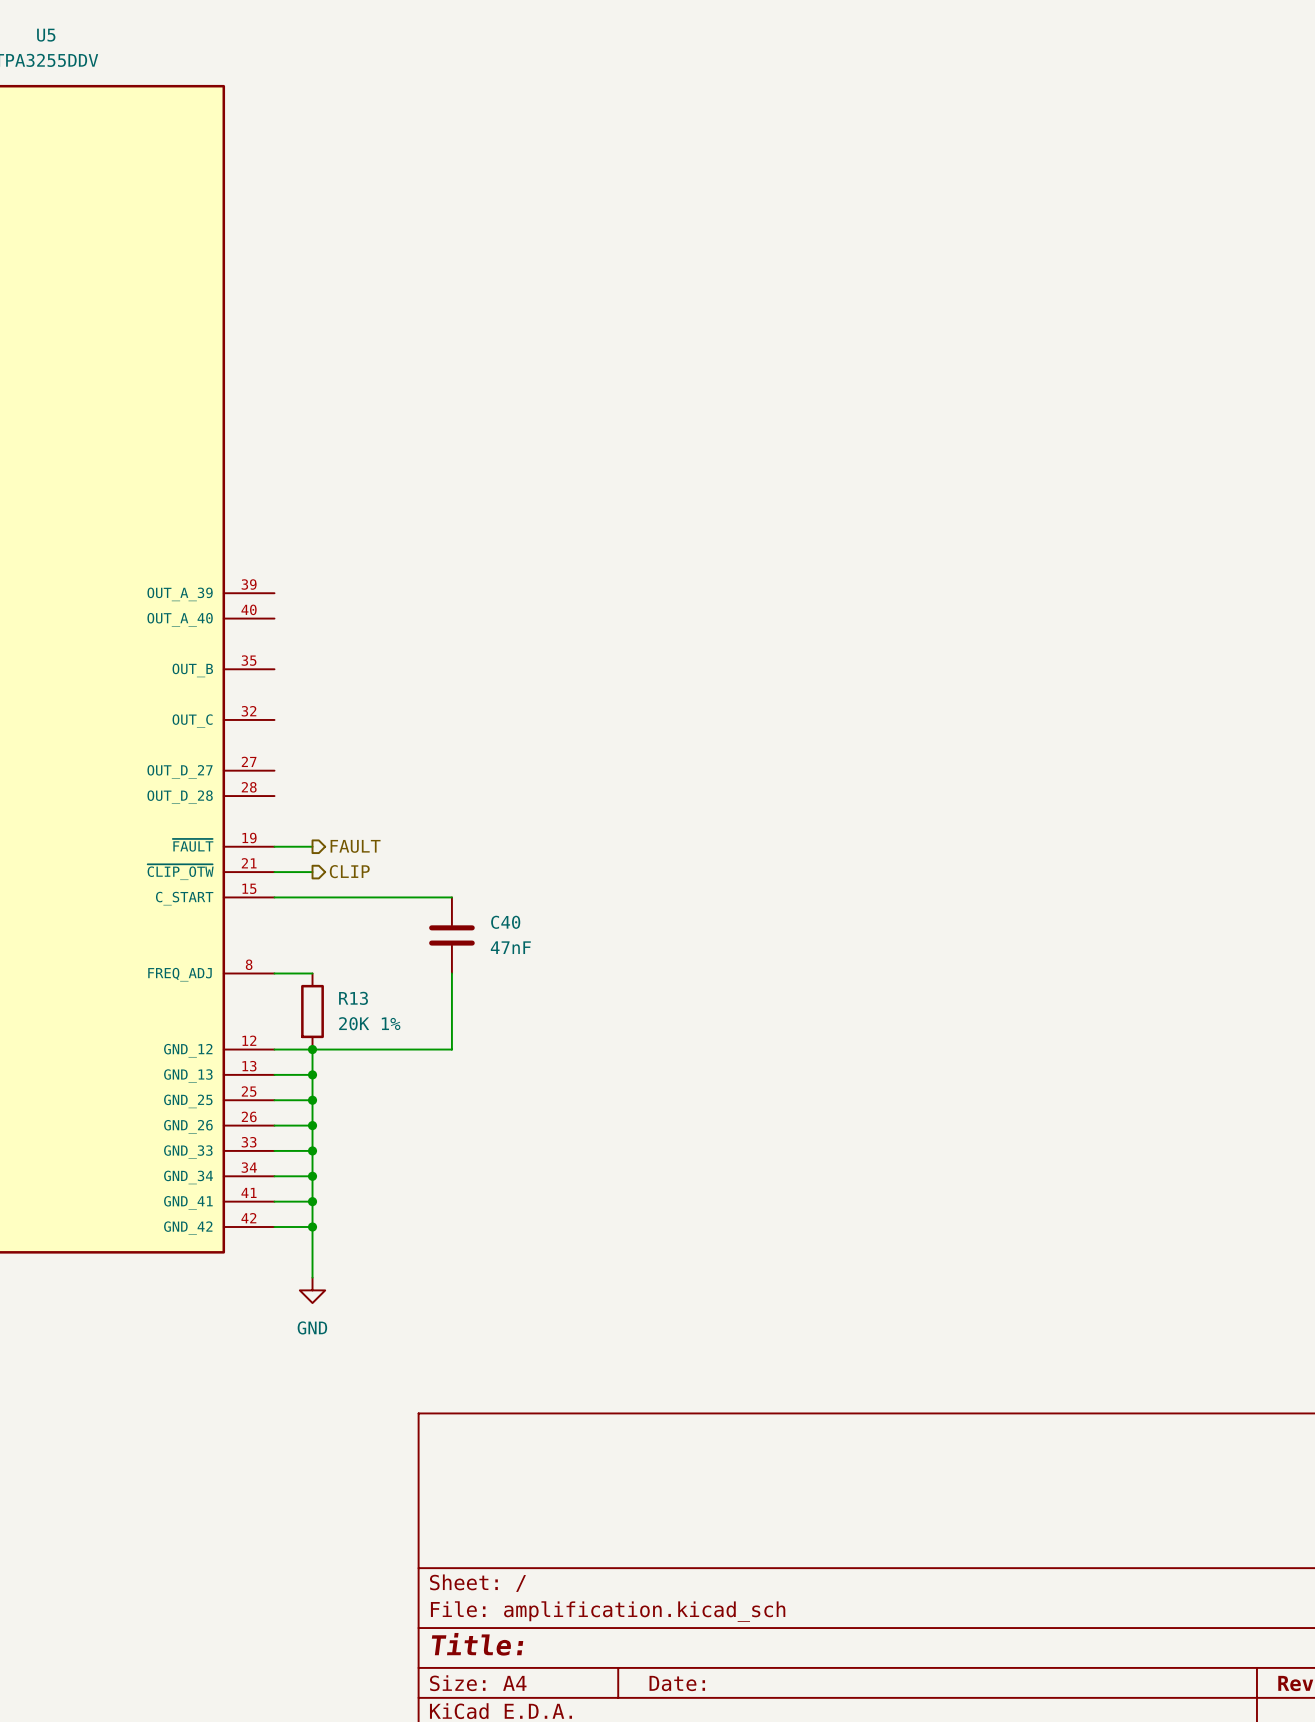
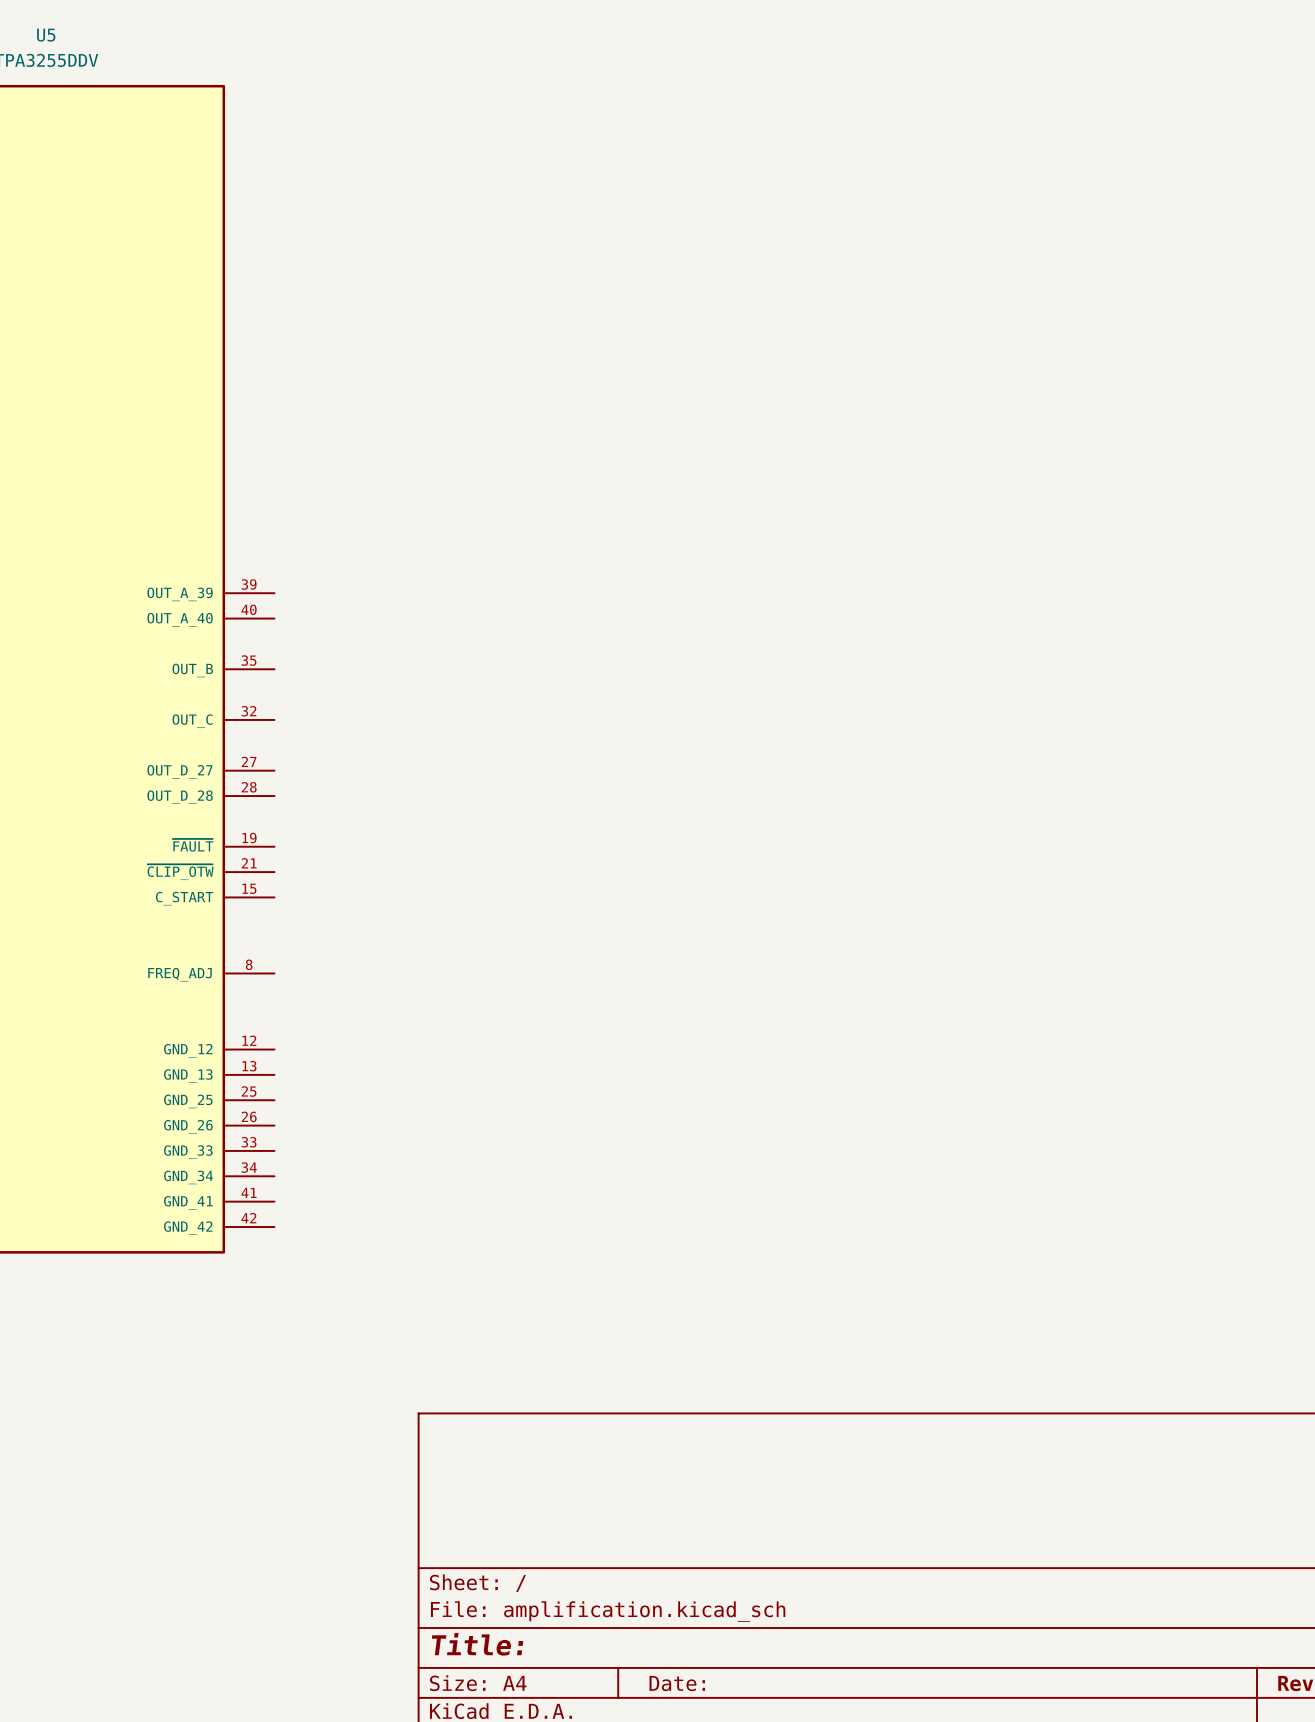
wire: (274, 846) (312, 846) -> none
hierarchical label: FAULT (355, 846) -> none
hierarchical label: CLIP (349, 871) -> none
wire: (274, 872) (312, 872) -> none
wire: (274, 897) (451, 897) -> none
C40: 47nF (451, 935) -> none
wire: (274, 973) (312, 973) -> none
wire: (451, 973) (451, 1049) (274, 1049) -> none
R13: 20K 1% (312, 1011) -> none
wire: (312, 1049) (312, 1277) -> none
junction: (312, 1049) -> none
wire: (274, 1074) (312, 1074) -> none
junction: (312, 1074) -> none
wire: (274, 1100) (312, 1100) -> none
junction: (312, 1100) -> none
wire: (274, 1125) (312, 1125) -> none
junction: (312, 1125) -> none
wire: (274, 1150) (312, 1150) -> none
junction: (312, 1150) -> none
wire: (274, 1176) (312, 1176) -> none
junction: (312, 1176) -> none
wire: (274, 1201) (312, 1201) -> none
junction: (312, 1201) -> none
wire: (274, 1227) (312, 1227) -> none
junction: (312, 1227) -> none
power symbol: GND (312, 1290) -> none

